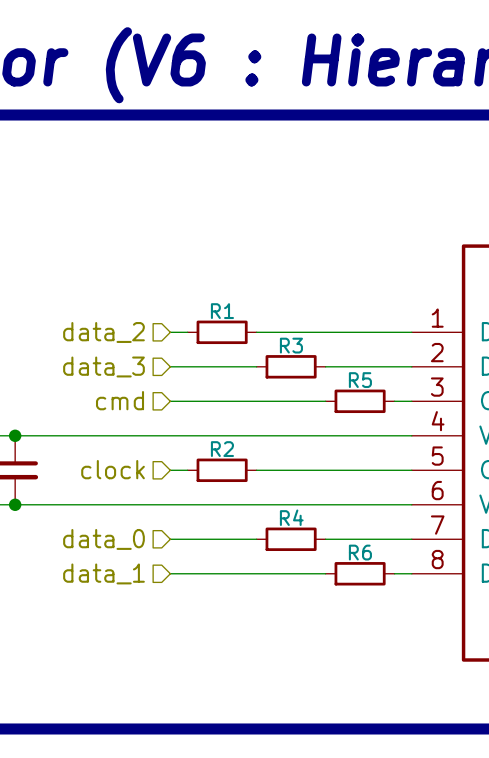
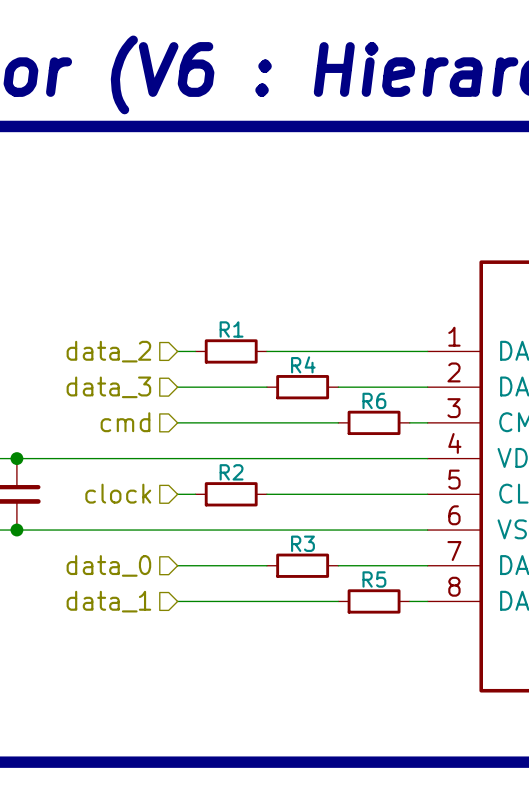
R3 name: R3 (291, 345) -> R4 (303, 364)
R5 name: R5 (360, 380) -> R6 (374, 400)
R4 name: R4 (291, 517) -> R3 (302, 543)
R6 name: R6 (360, 552) -> R5 (374, 579)

